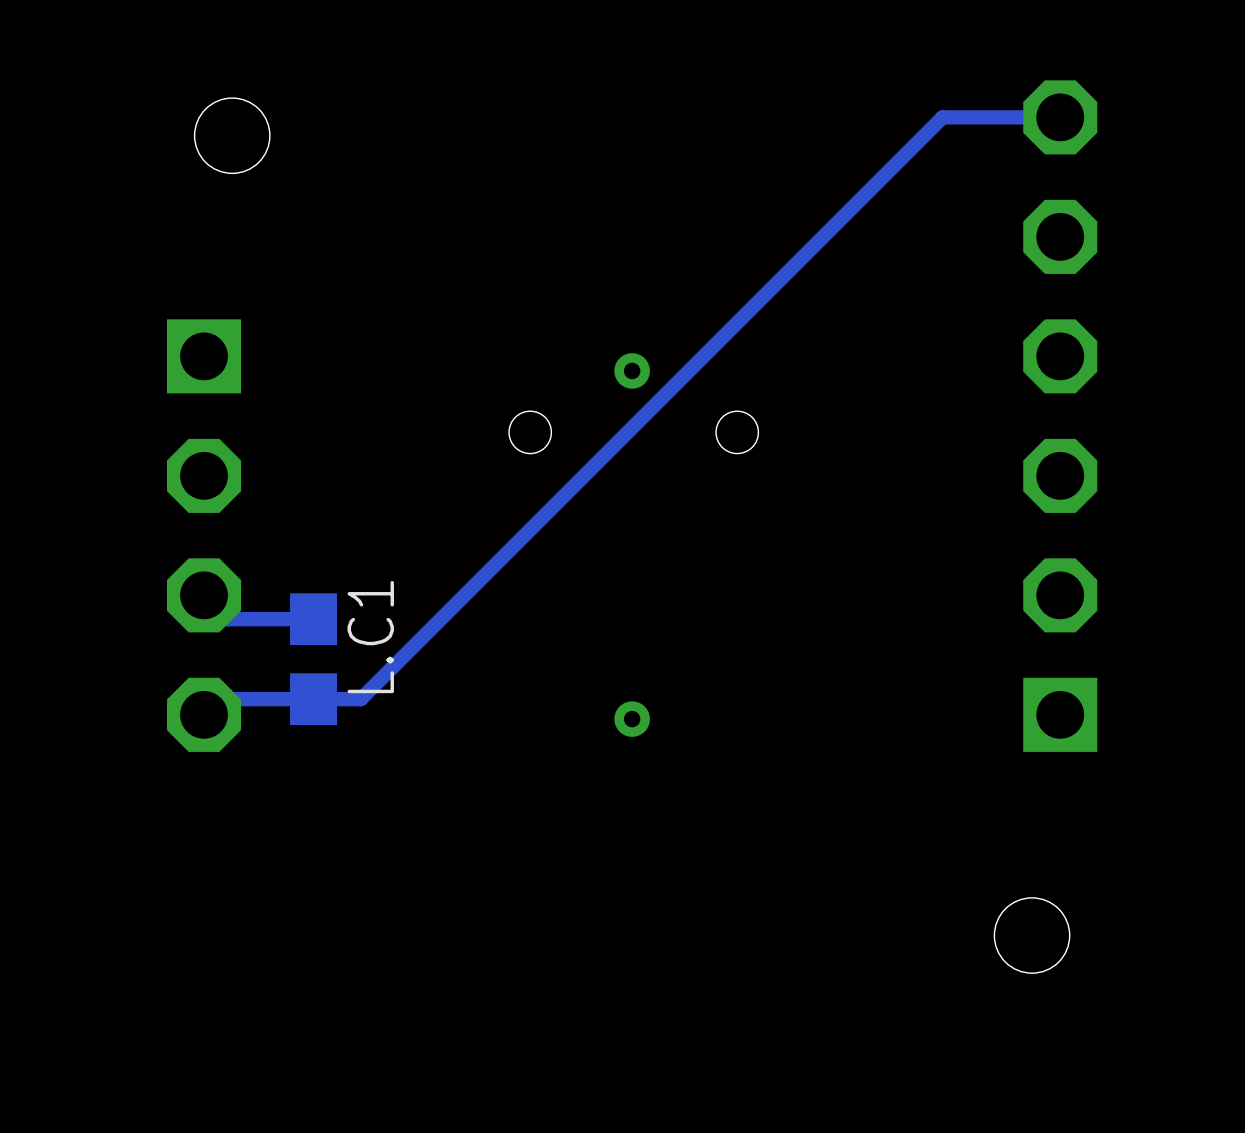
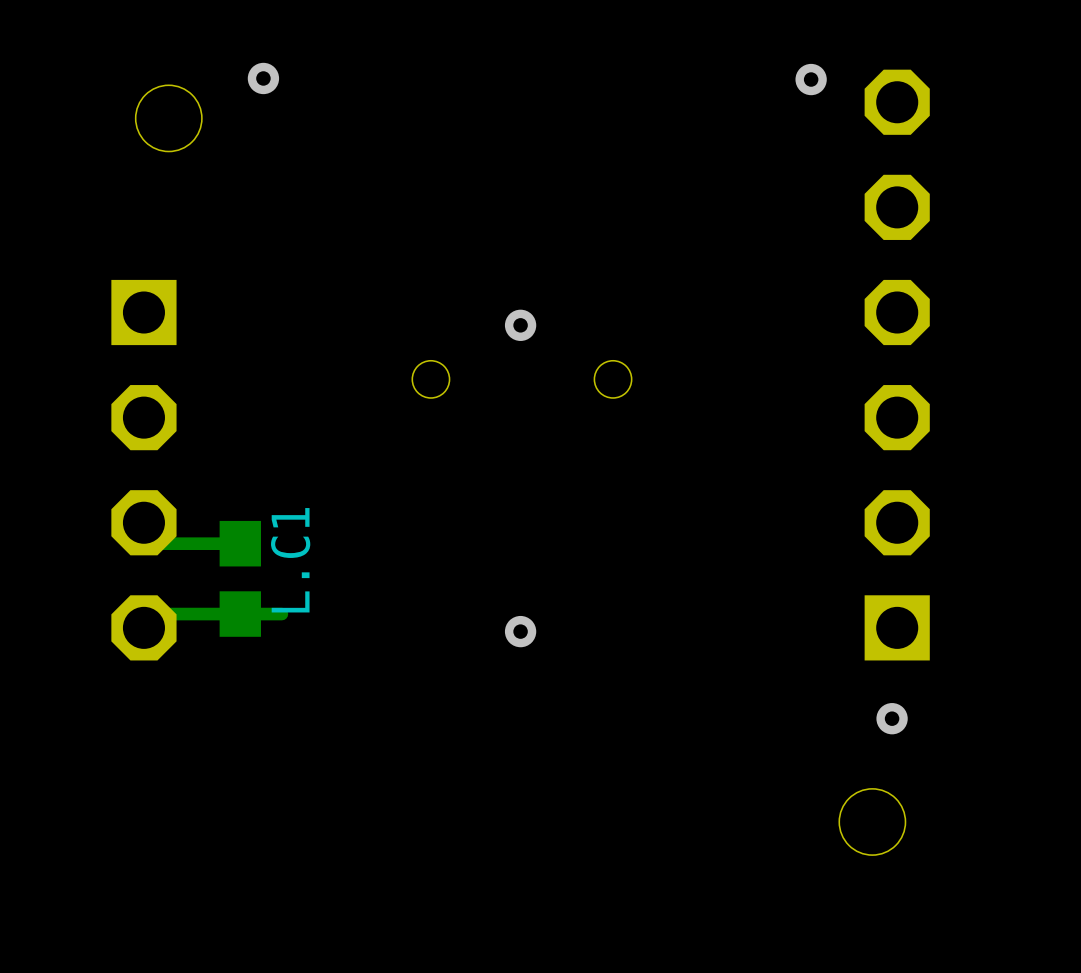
via: none -> (263, 78)
via: none -> (811, 79)
track: (1060, 117) (942, 117) (360, 699) -> none
via: none -> (892, 718)

